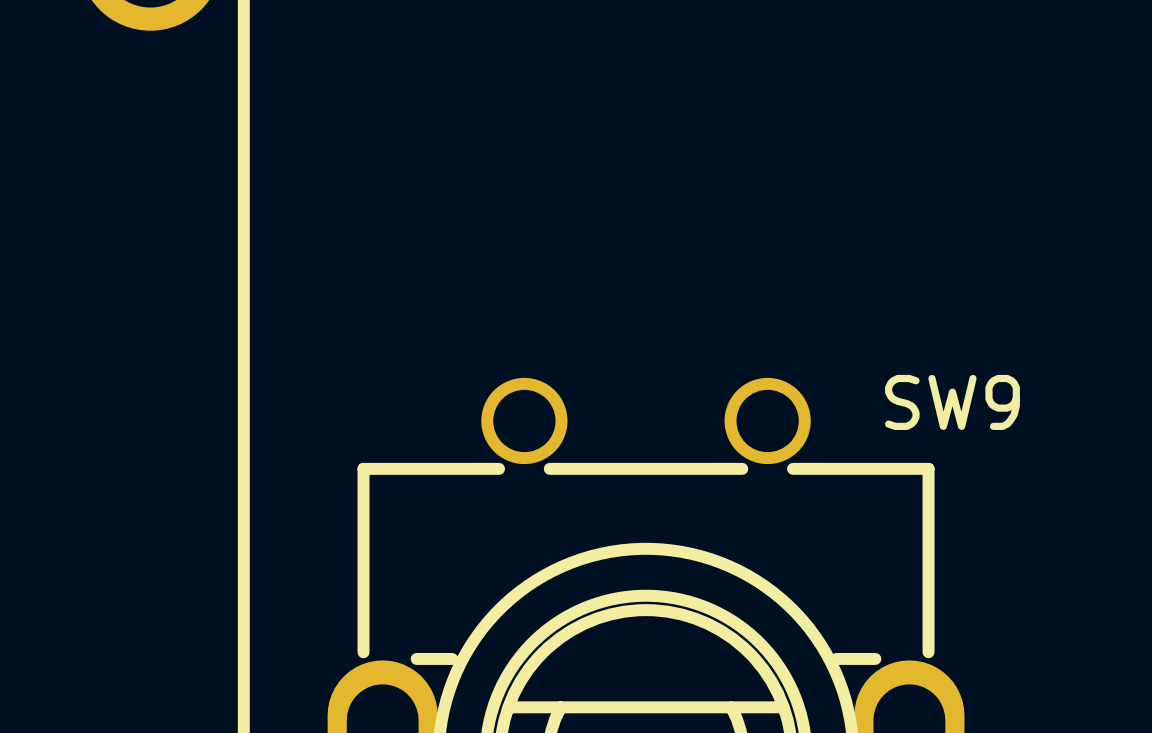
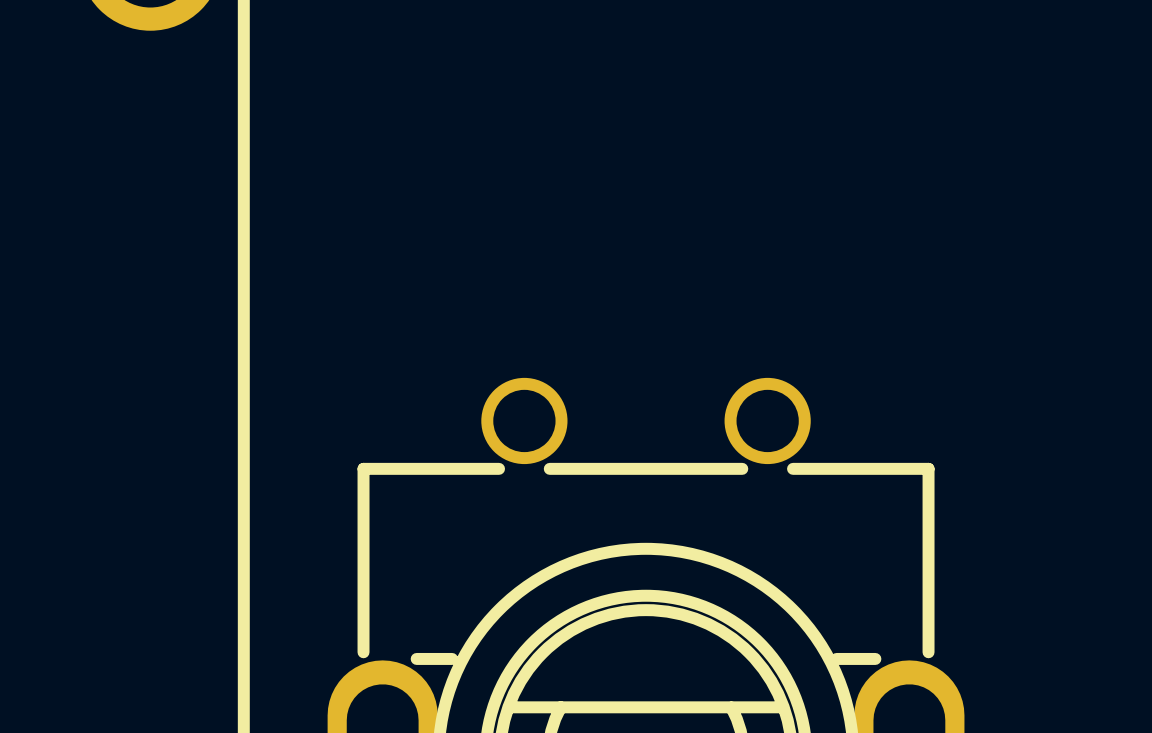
SW9 name: SW9 (952, 402) -> none

